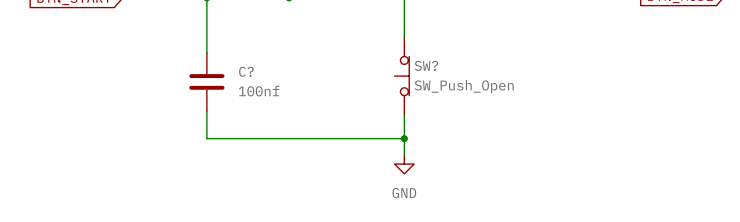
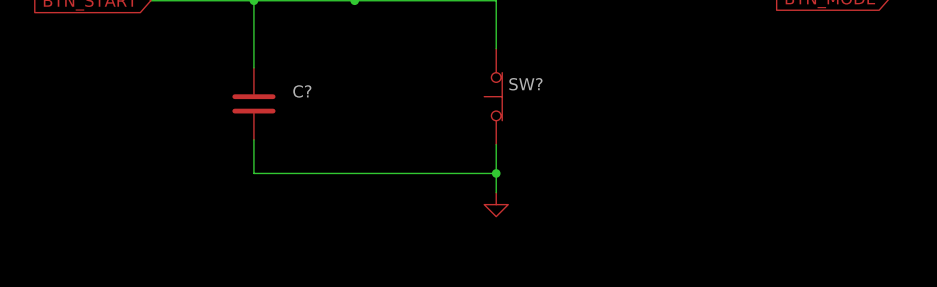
SW? value: SW_Push_Open (464, 86) -> none
C? value: 100nf (259, 91) -> none
power symbol text: GND (404, 193) -> none

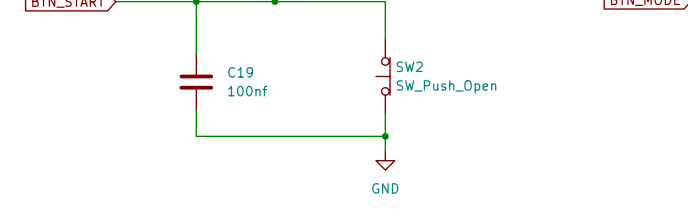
SW? name: SW? (525, 84) -> SW2 (409, 66)
C? name: C? (302, 91) -> C19 (240, 72)
SW? value: none -> SW_Push_Open (446, 87)
C? value: none -> 100nf (247, 91)
power symbol text: none -> GND (385, 188)

